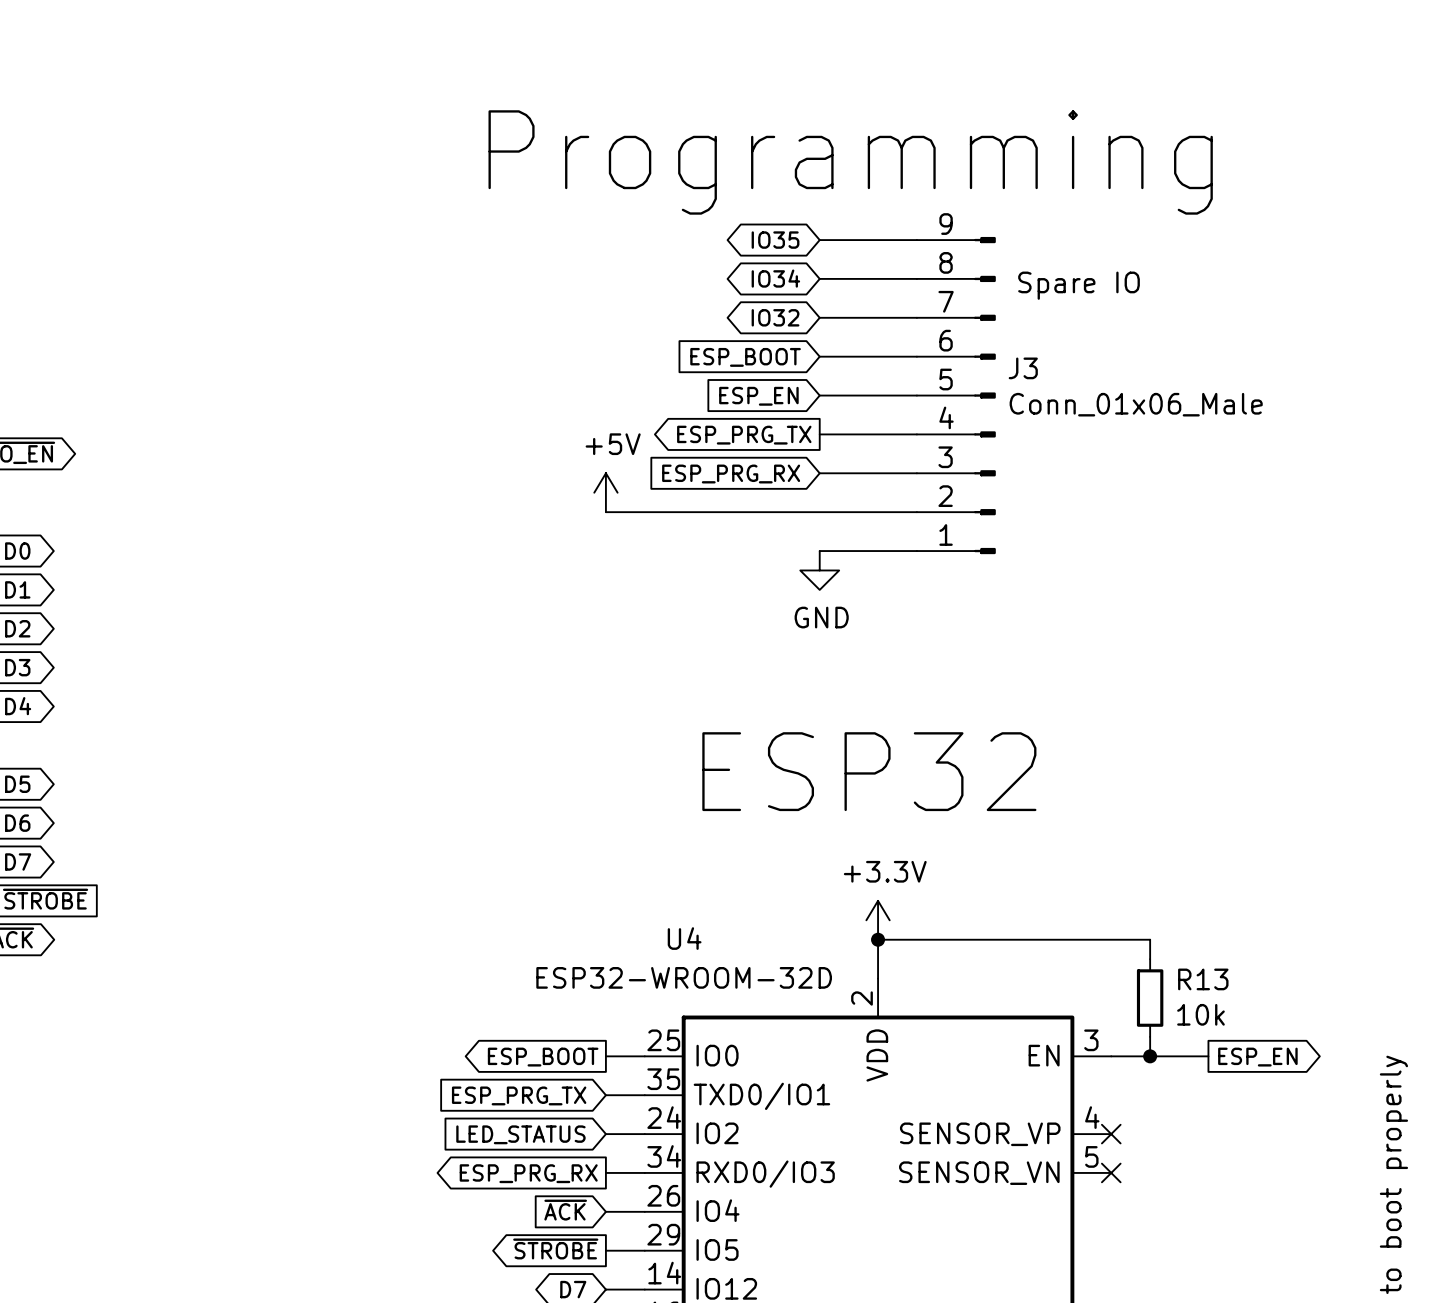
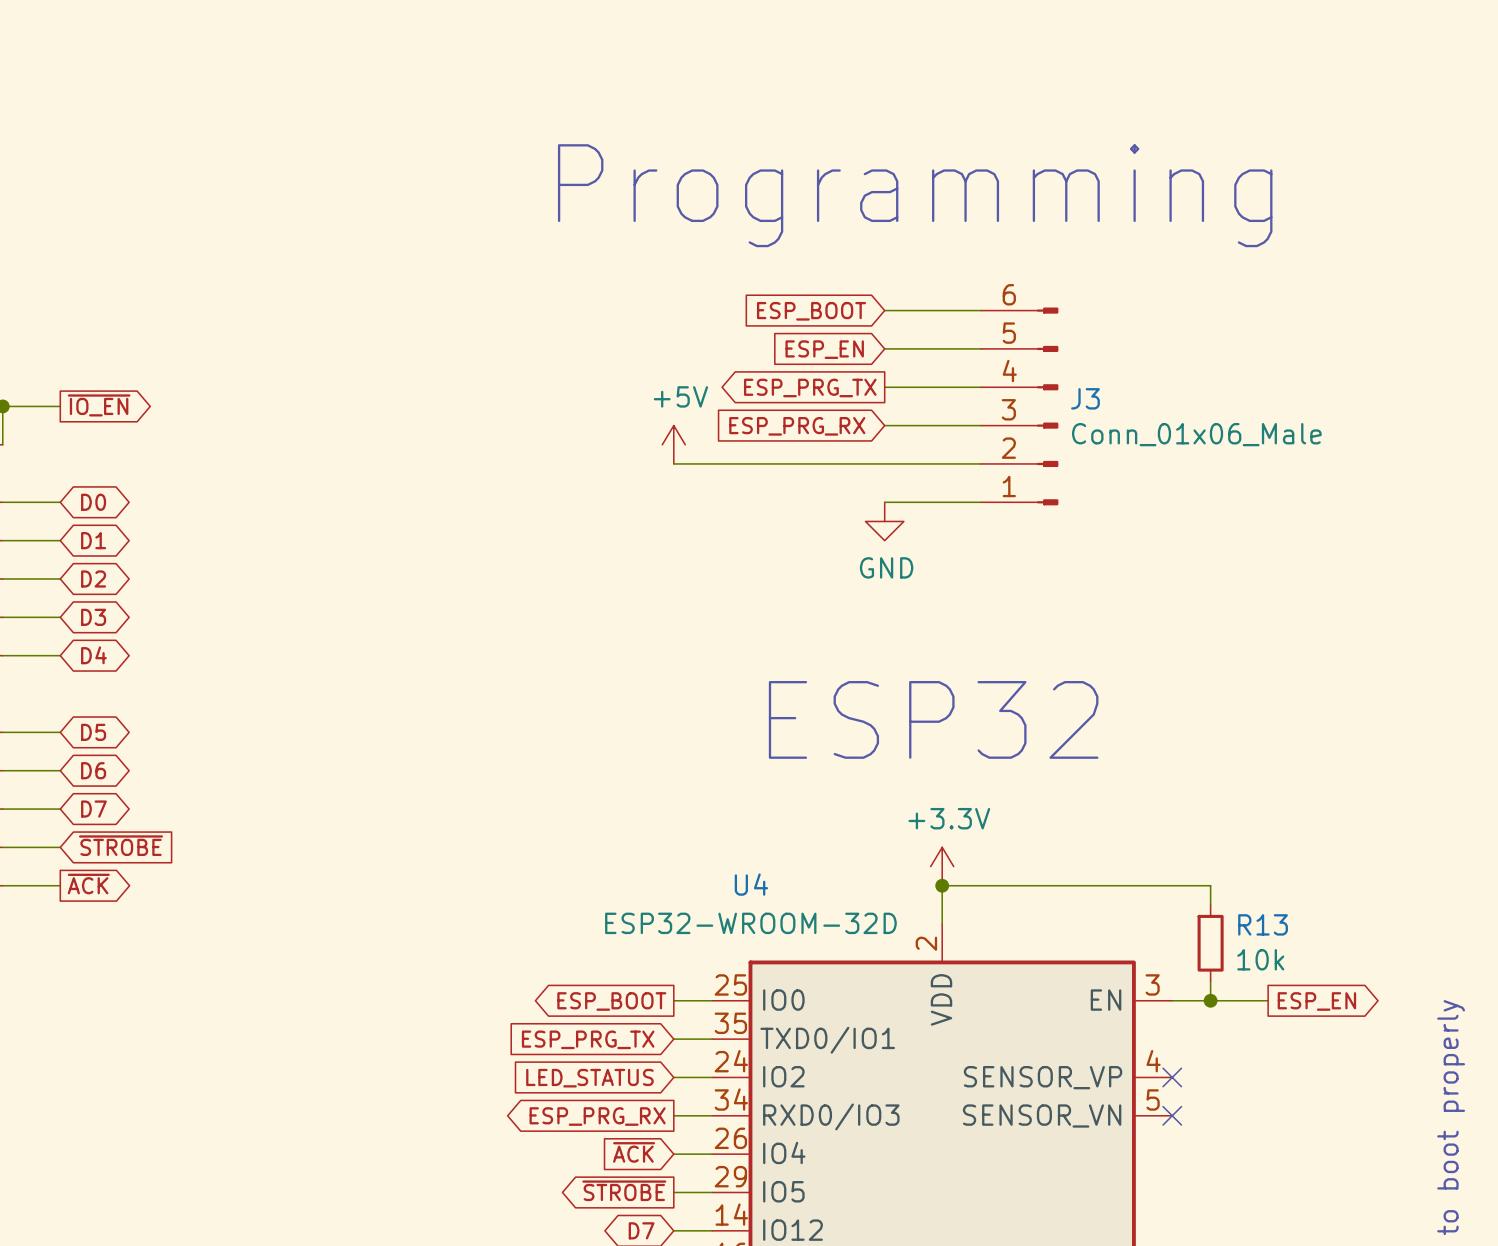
text position: Programming (850, 162) -> Programming (915, 195)
J3 symbol: [916, 236, 996, 555] -> [980, 307, 1059, 506]
global label: IO35 (775, 240) -> none
wire: (819, 240) (916, 240) -> none
global label: IO34 (775, 278) -> none
wire: (819, 278) (916, 278) -> none
text: Spare IO (1079, 285) -> none
global label: IO32 (775, 317) -> none
wire: (819, 317) (916, 317) -> none

